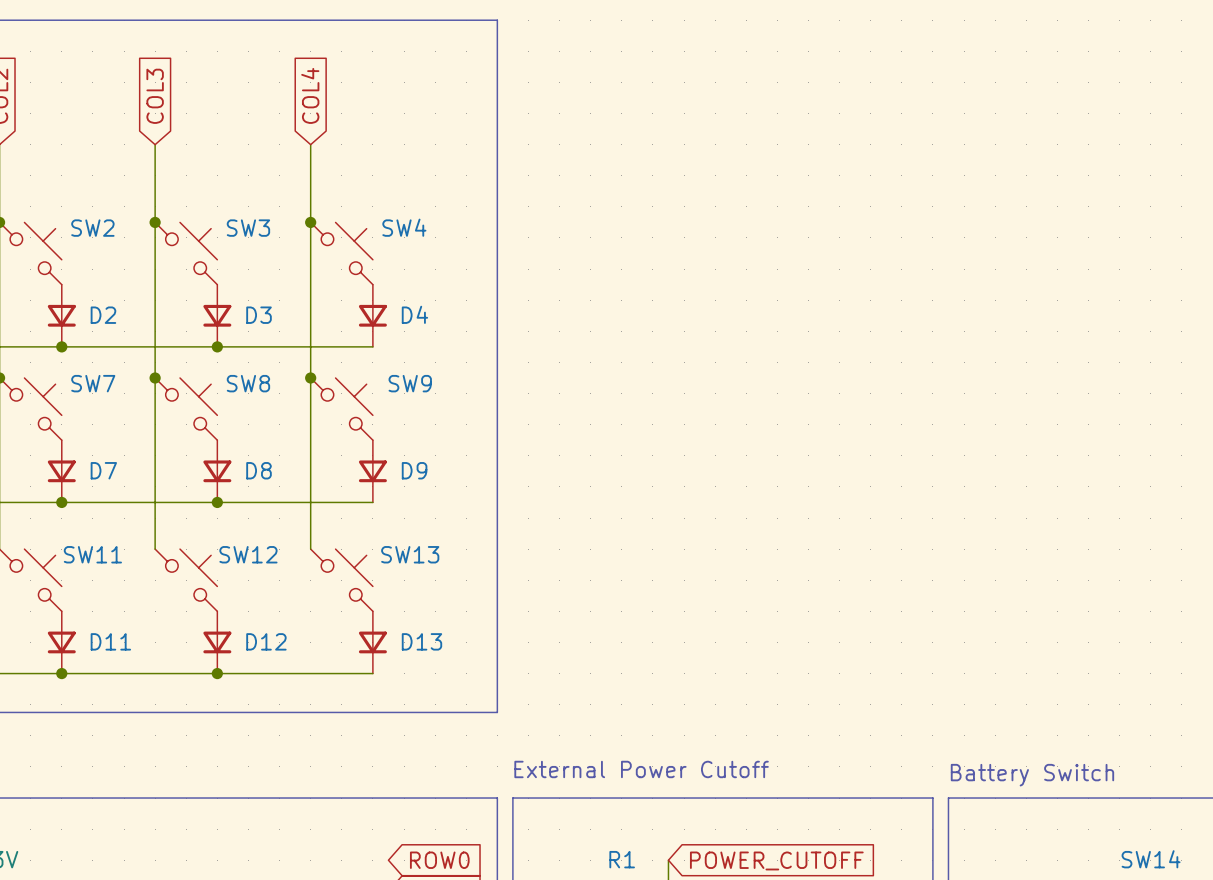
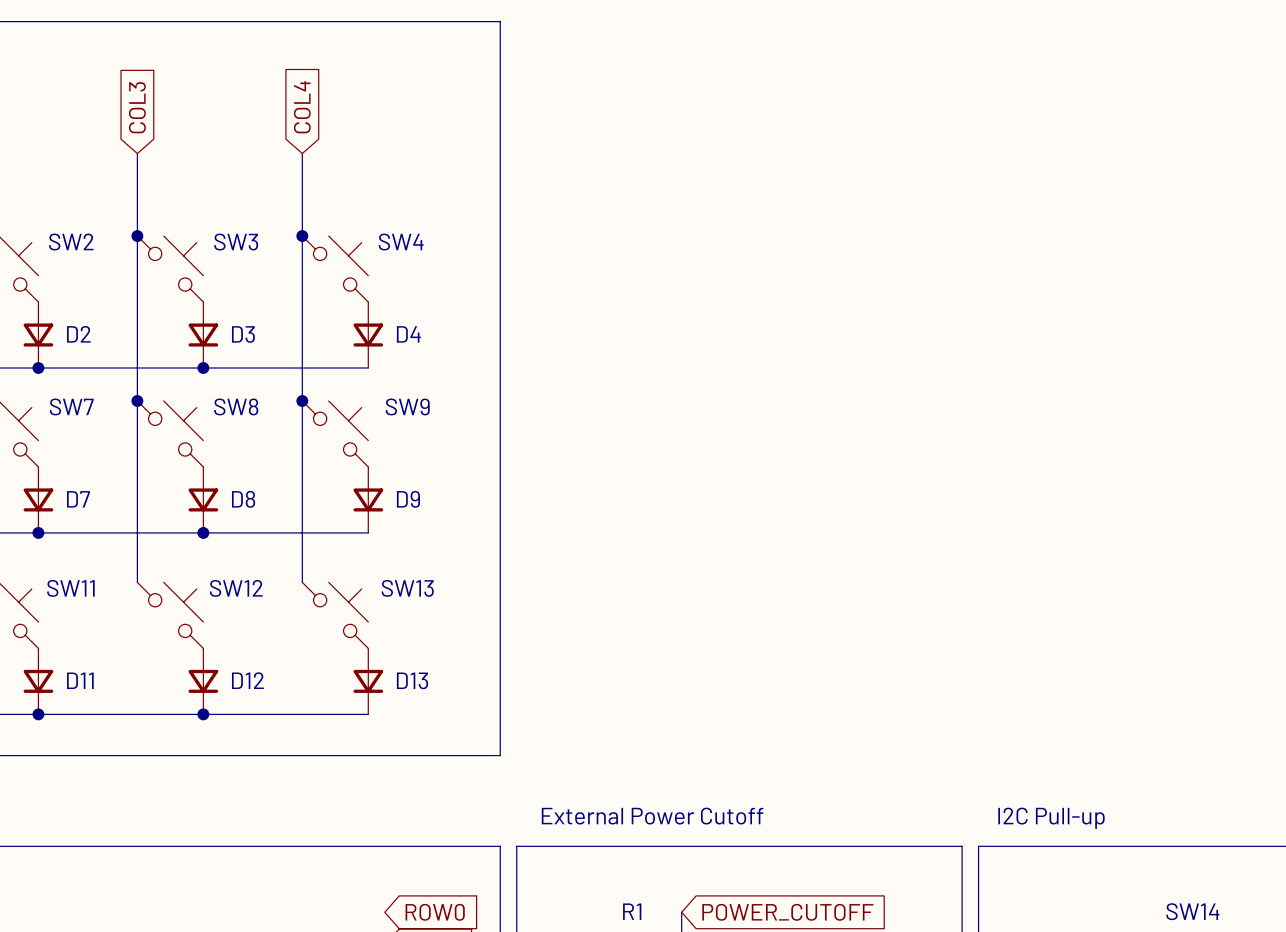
text: none -> I2C Pull-up (1051, 818)
text: Battery Switch (1032, 775) -> none

